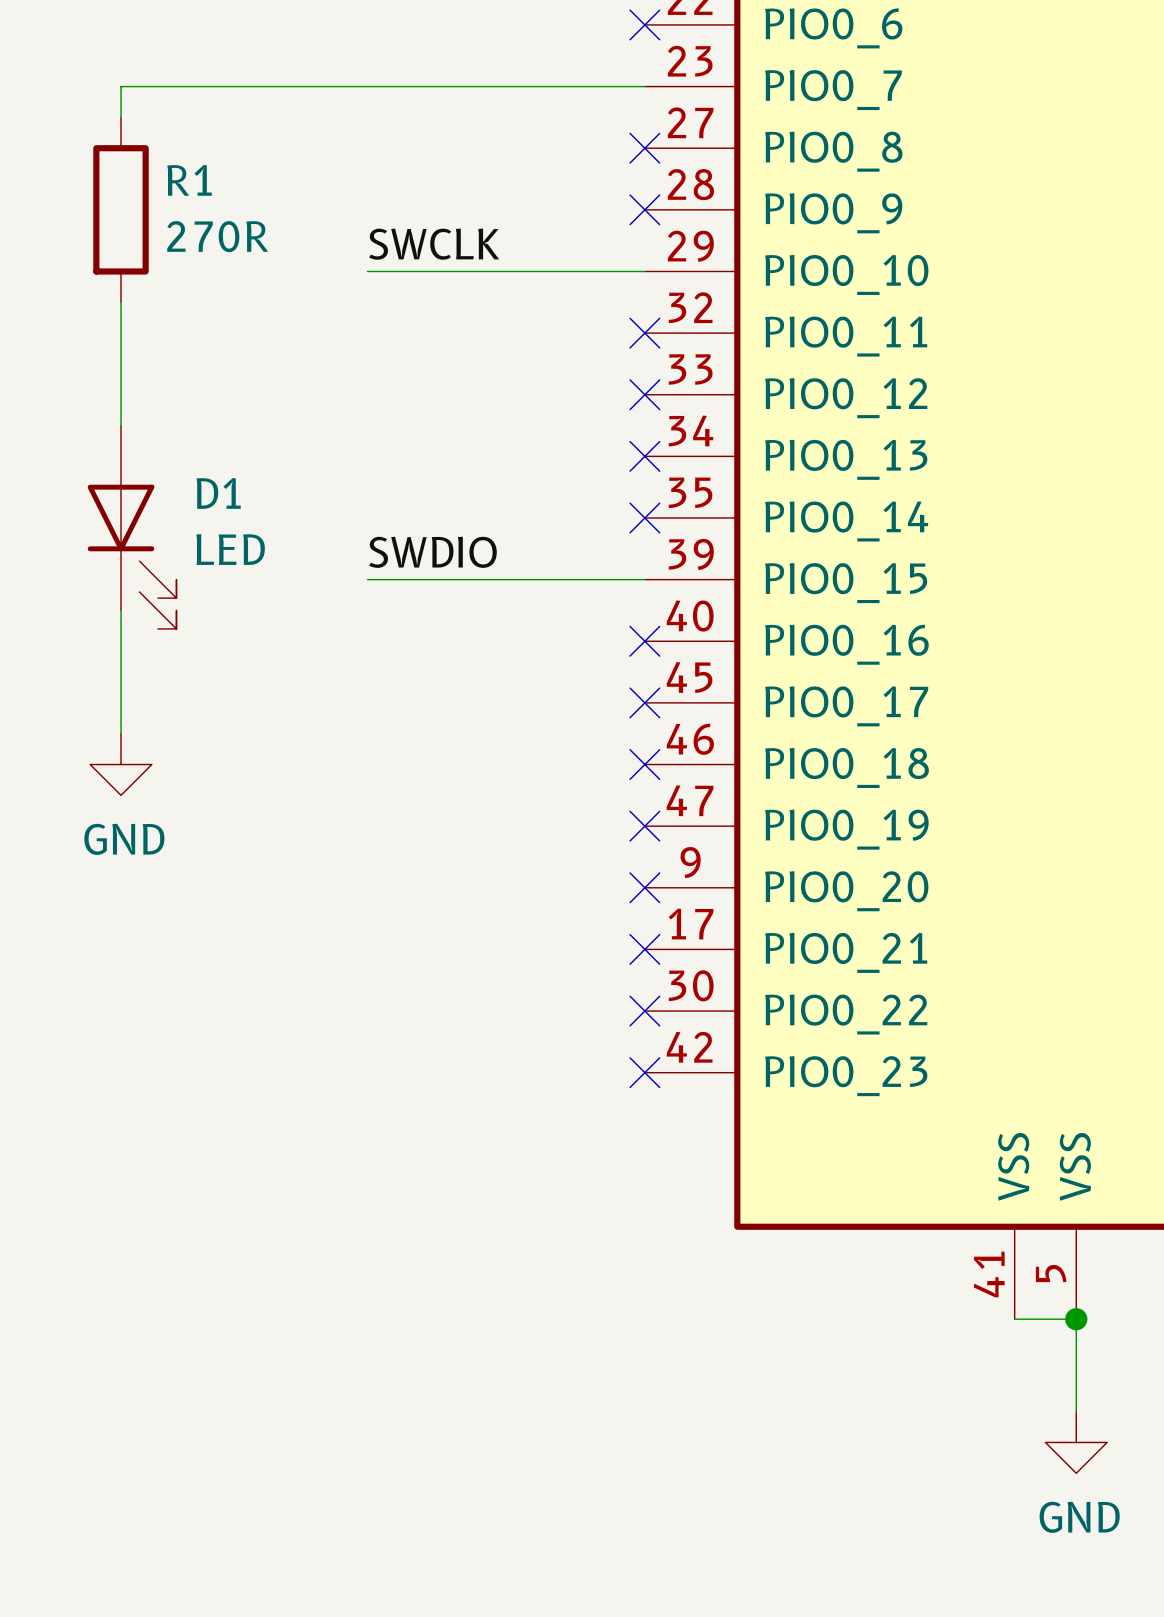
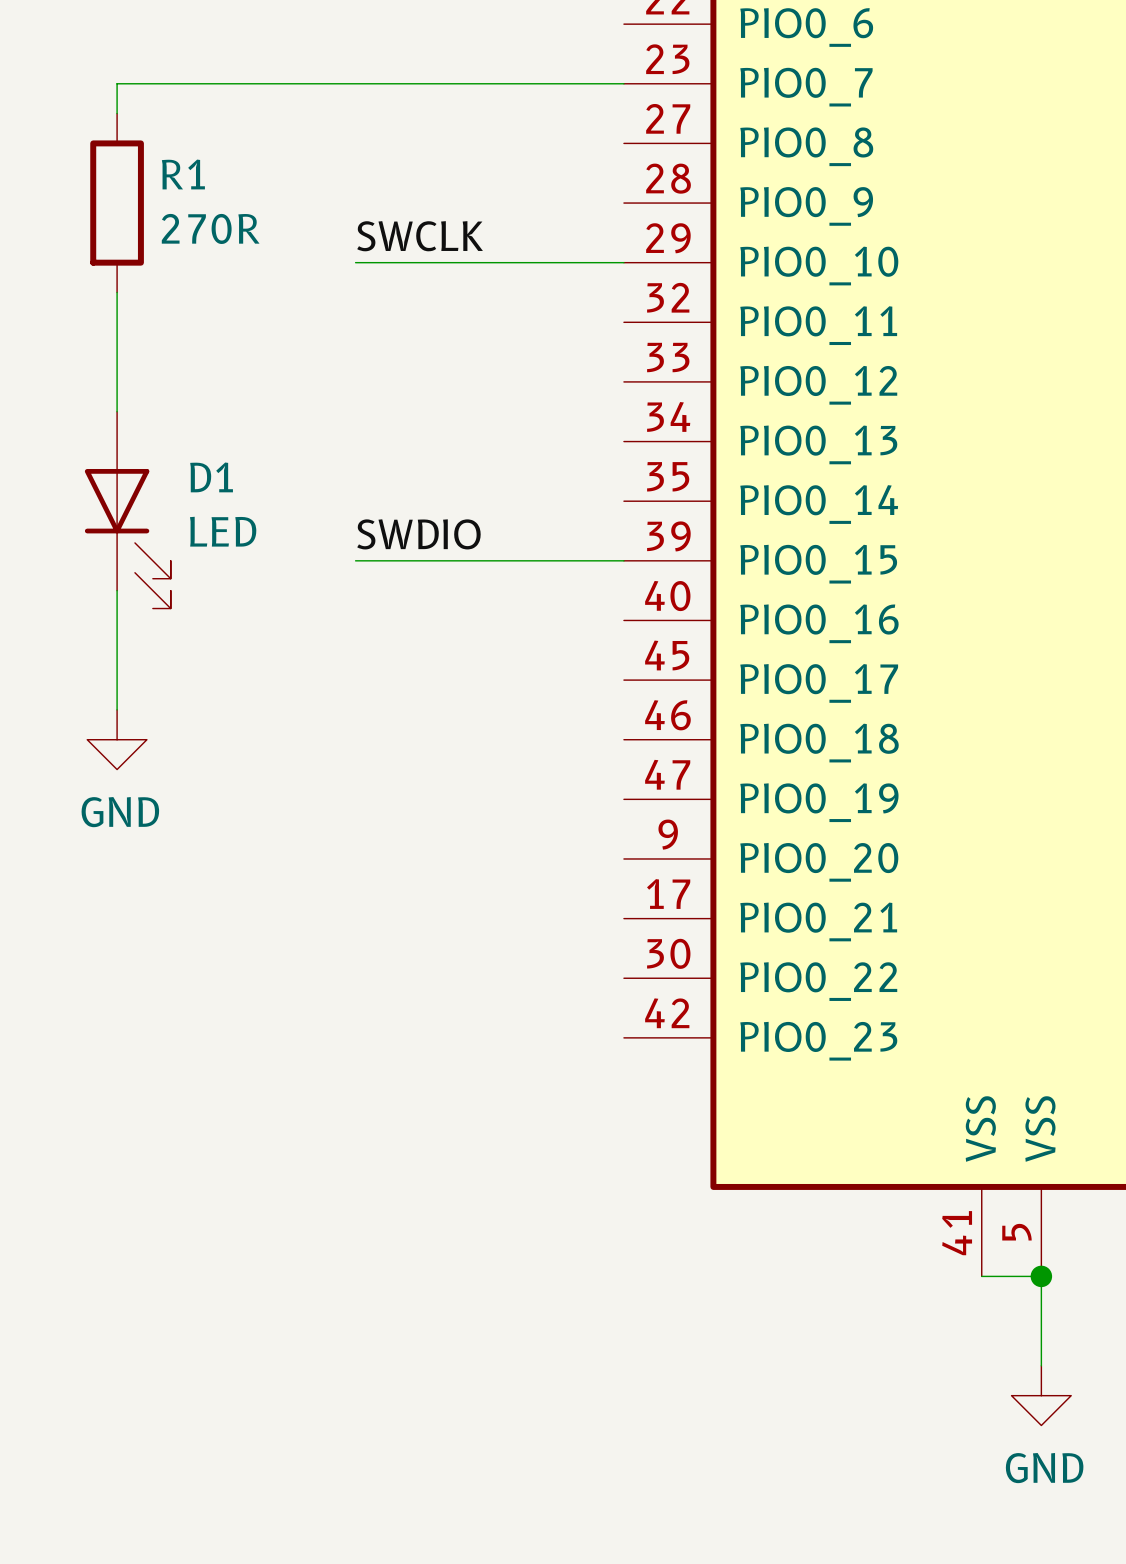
no-connect mark: (644, 24) -> none
no-connect mark: (644, 148) -> none
no-connect mark: (644, 209) -> none
no-connect mark: (644, 333) -> none
no-connect mark: (644, 394) -> none
no-connect mark: (644, 456) -> none
no-connect mark: (644, 518) -> none
no-connect mark: (644, 641) -> none
no-connect mark: (644, 702) -> none
no-connect mark: (644, 764) -> none
no-connect mark: (644, 826) -> none
no-connect mark: (644, 887) -> none
no-connect mark: (644, 949) -> none
no-connect mark: (644, 1011) -> none
no-connect mark: (644, 1072) -> none

